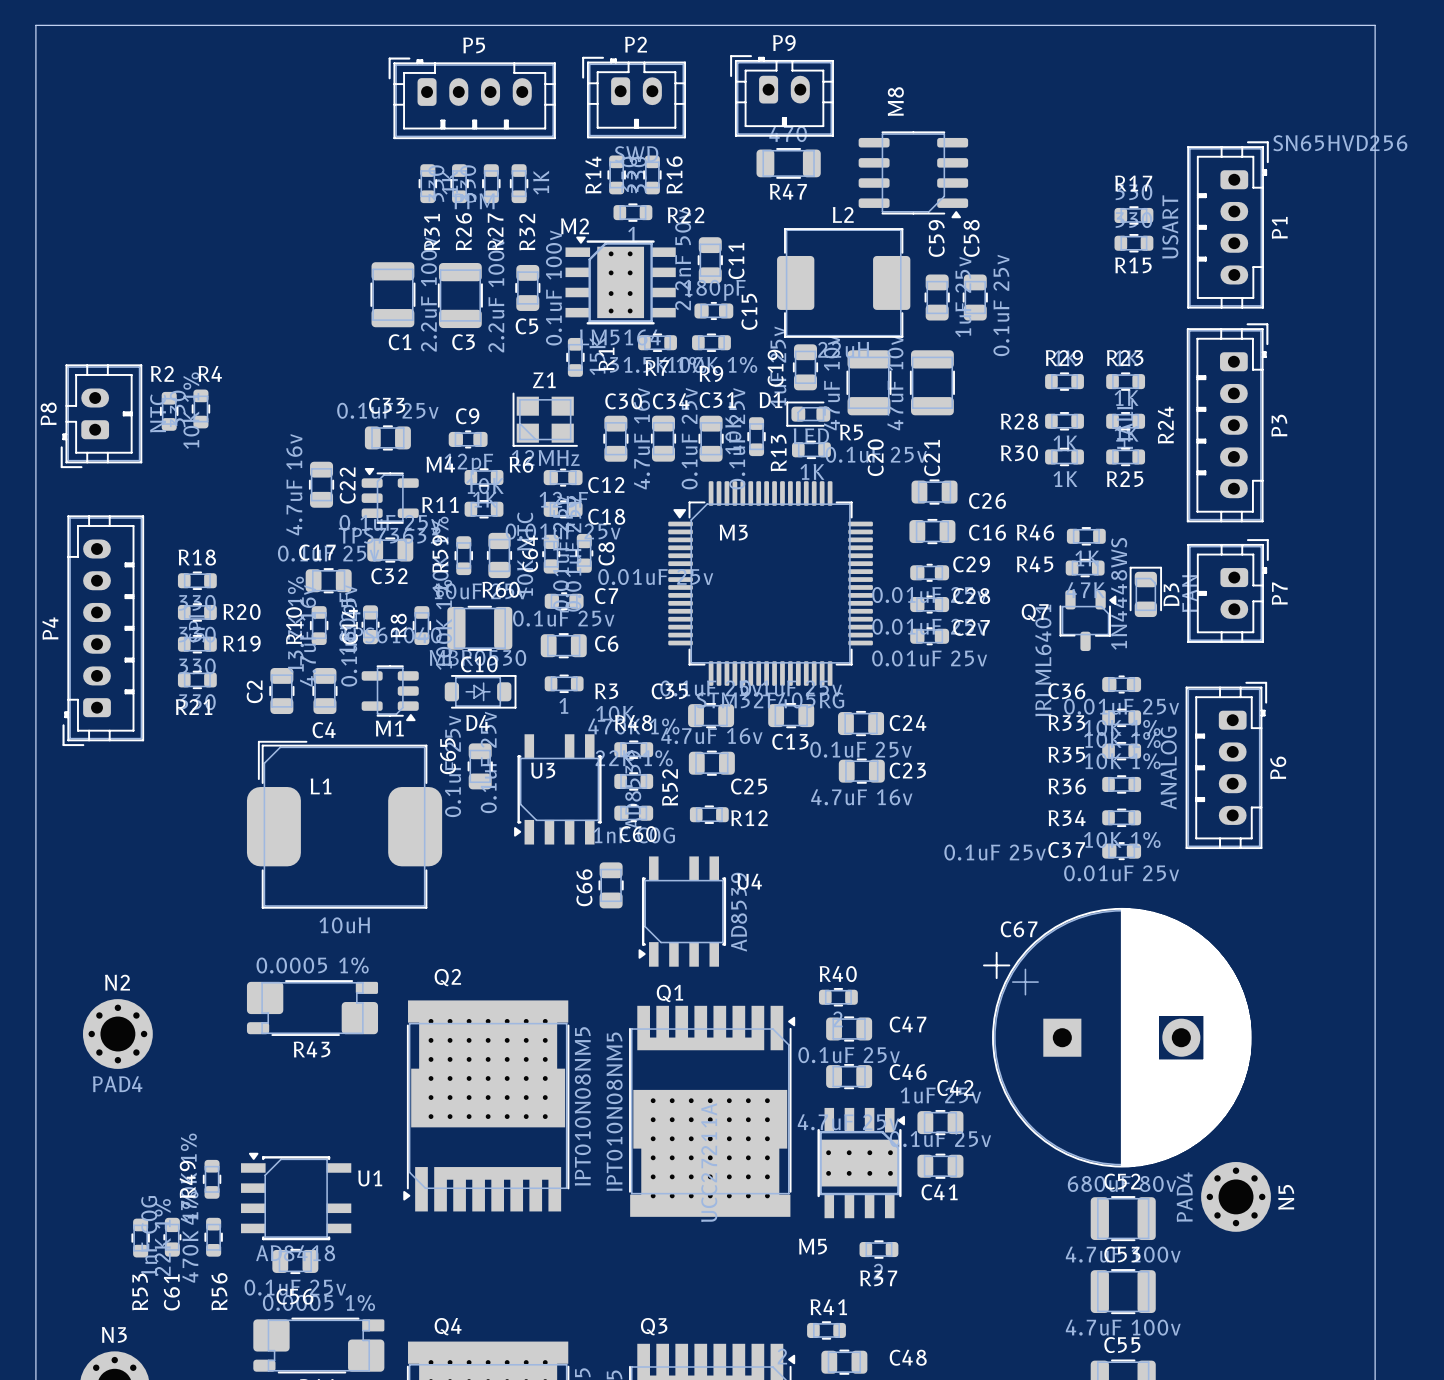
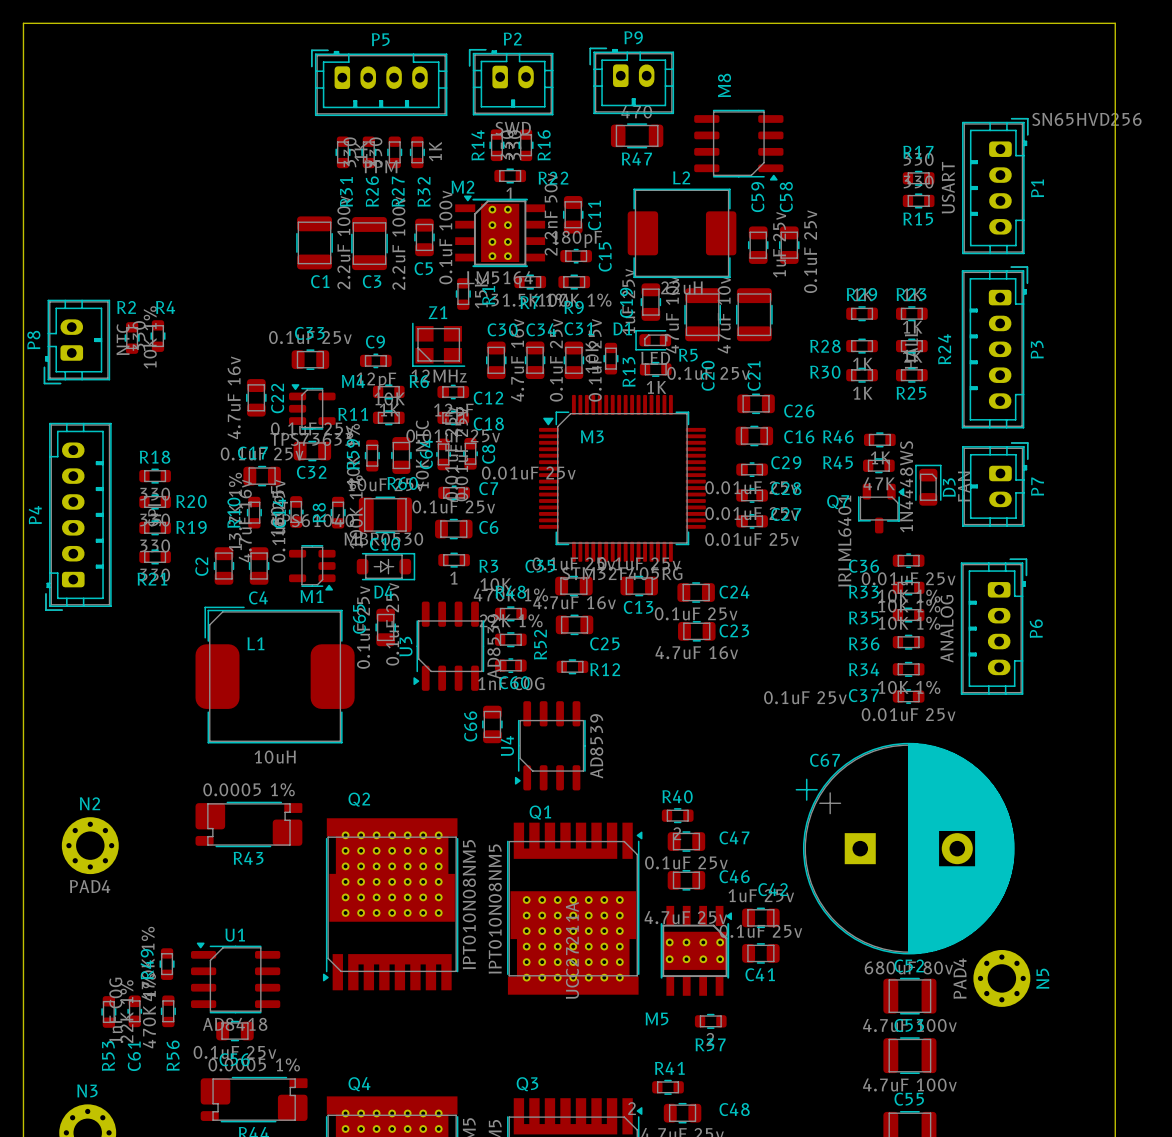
U3 footprint: [514, 734, 602, 845] -> [413, 601, 485, 691]
U3 name position: U3 (543, 770) -> U3 (405, 646)
U4 footprint: [638, 856, 727, 967] -> [514, 701, 586, 791]
U4 name rotation: 0° (749, 881) -> 90° counterclockwise (507, 746)
U4 name position: U4 (749, 881) -> U4 (507, 746)
U1 footprint: [241, 1152, 352, 1241] -> [190, 942, 281, 1014]
U1 name position: U1 (370, 1178) -> U1 (235, 935)

